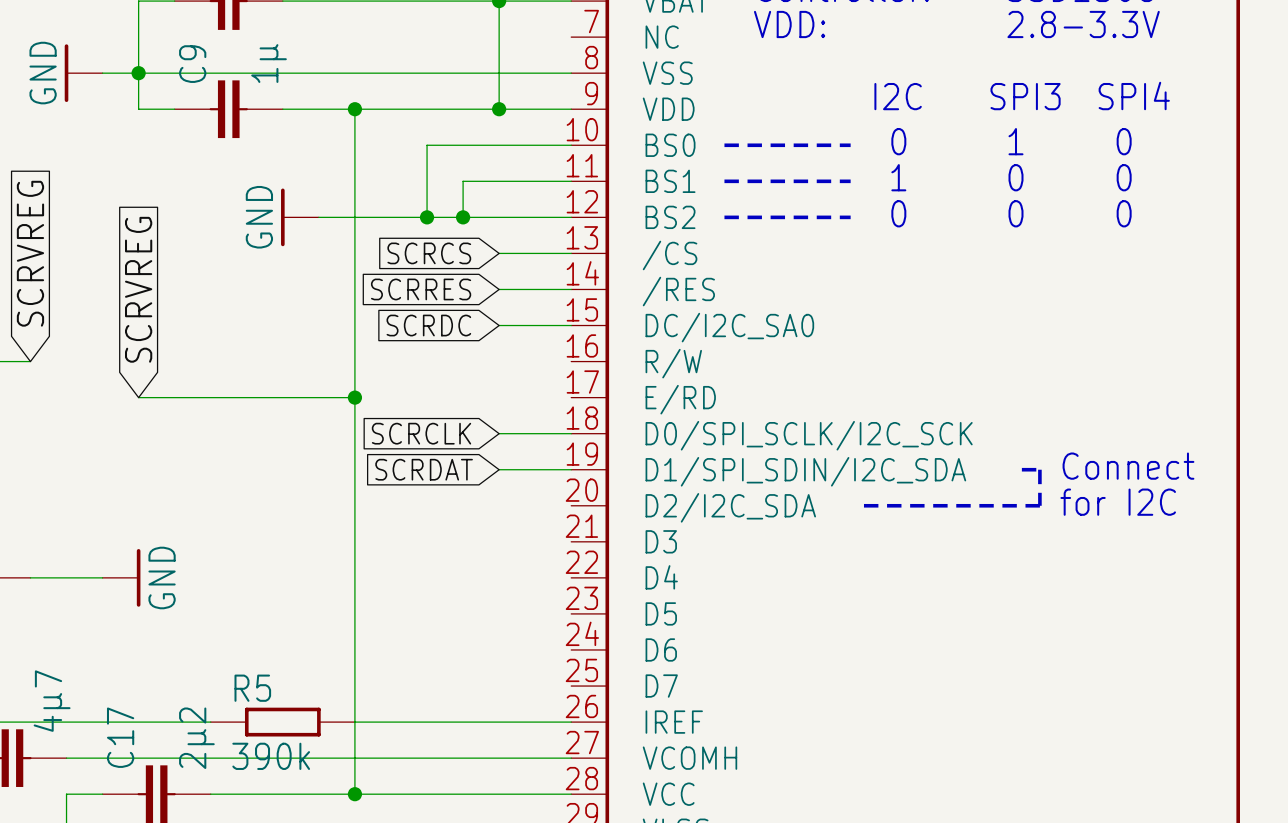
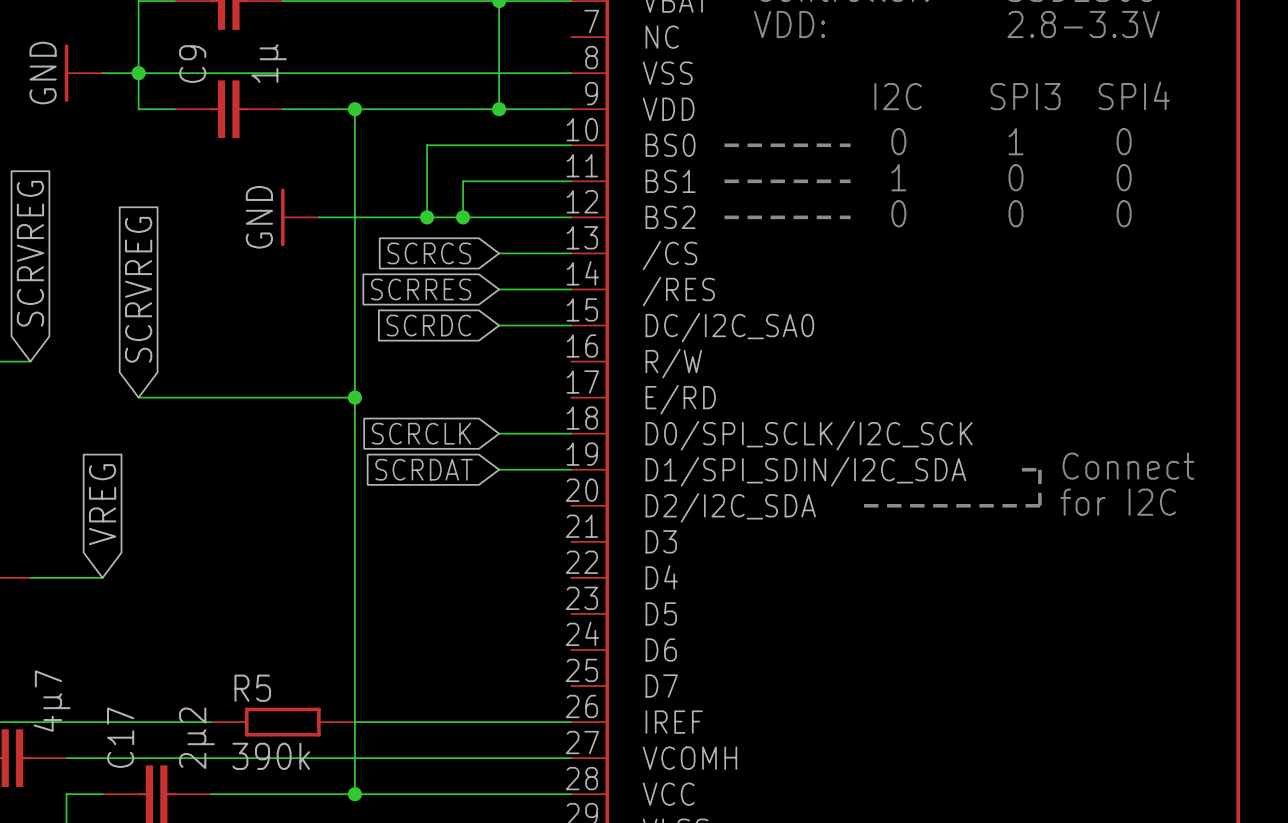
global label: none -> VREG (102, 504)
power symbol: GND (121, 577) -> none

